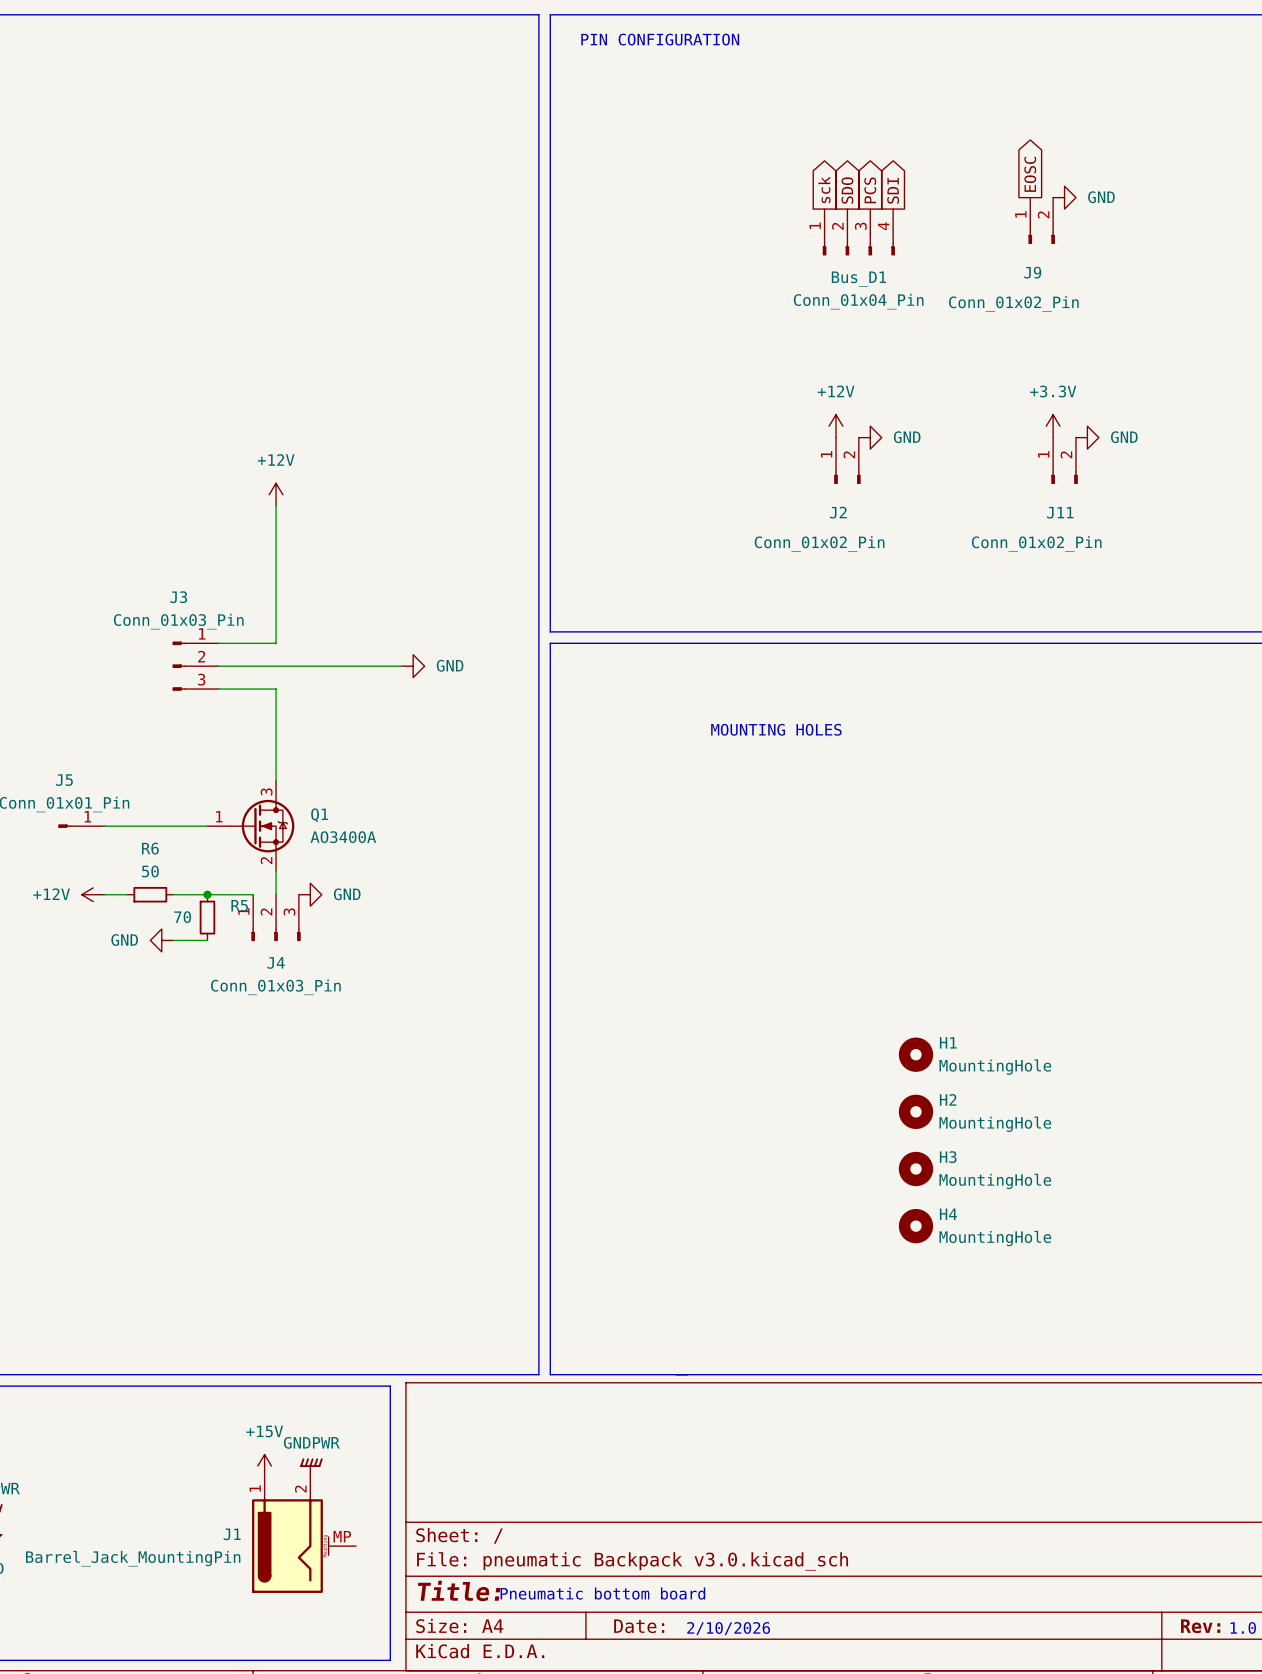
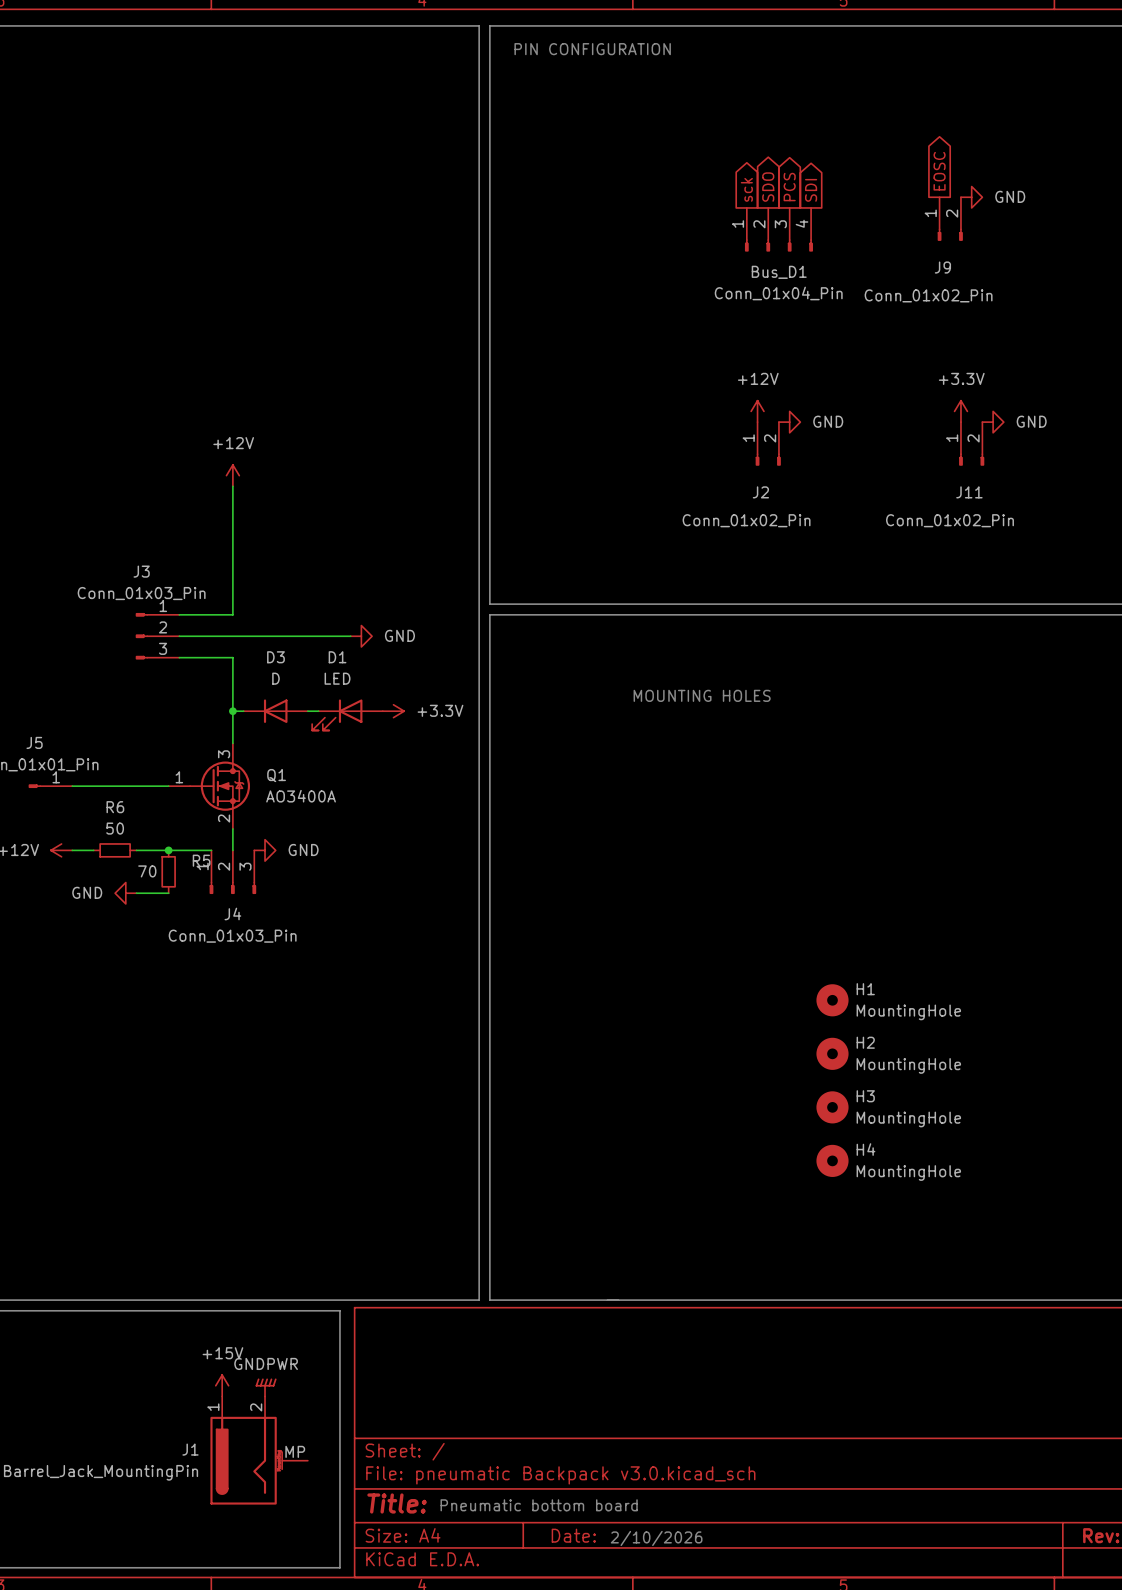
wire: none -> (232, 711) (243, 711)
junction: none -> (232, 711)
D3: none -> D (275, 711)
wire: none -> (307, 711) (318, 711)
power symbol: none -> +3.3V (393, 711)
D1: none -> LED (347, 714)

